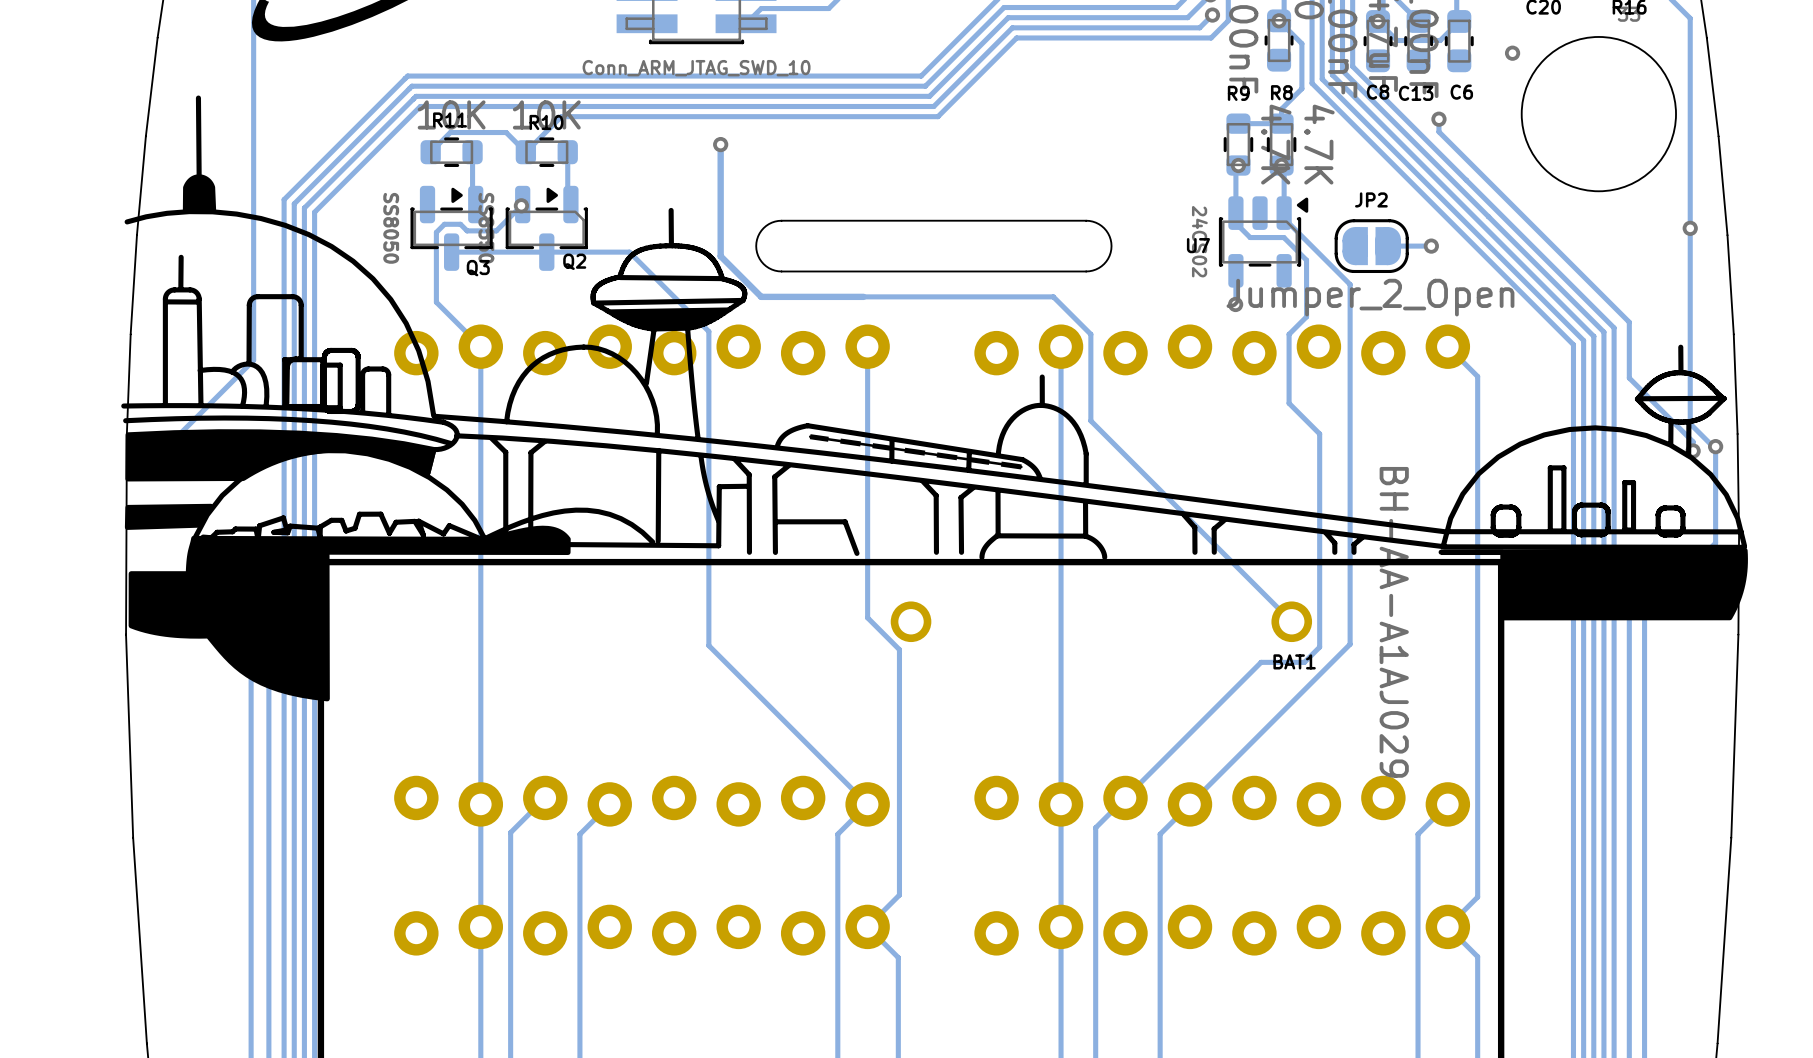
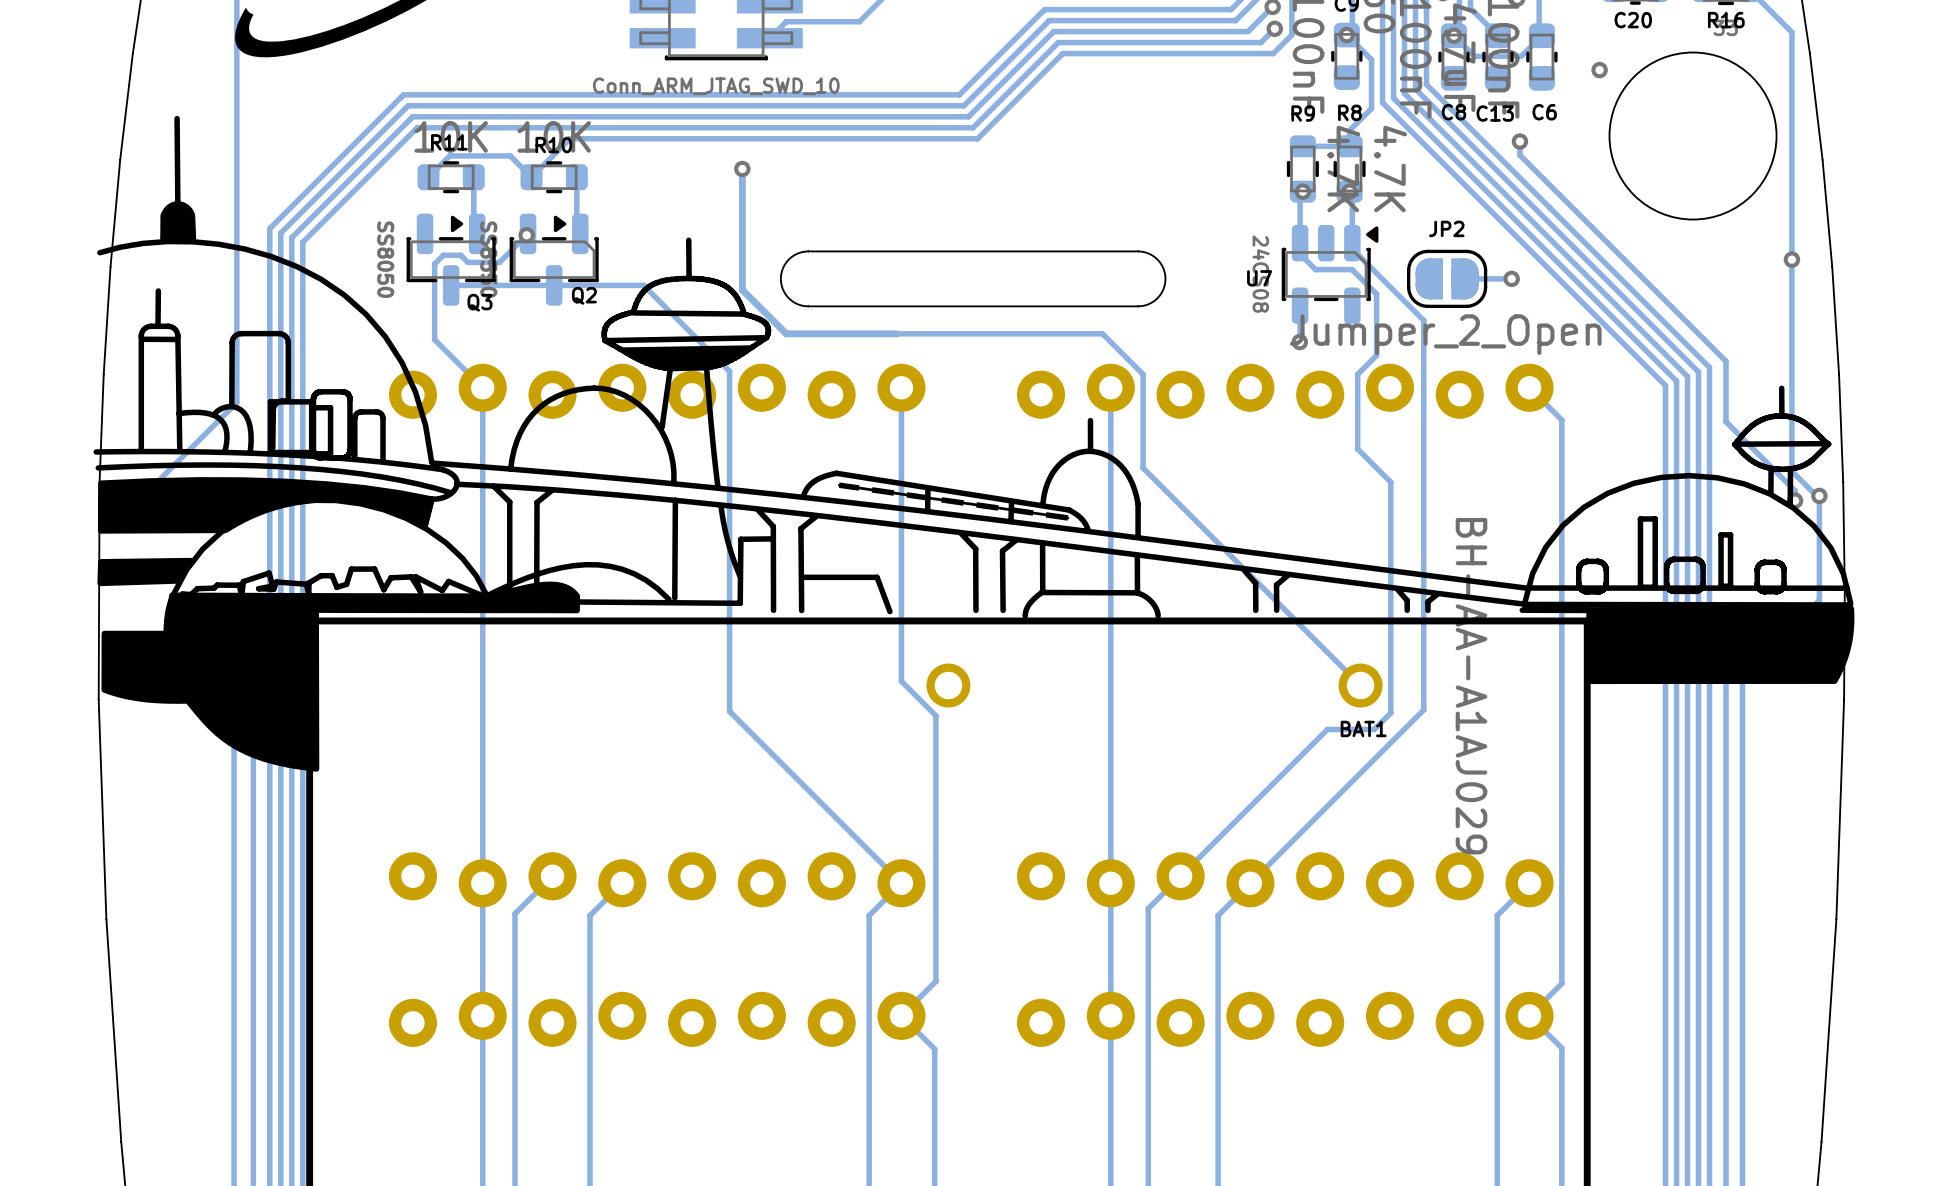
U7 value: 24CS02 (1199, 241) -> 24CS08 (1261, 274)

